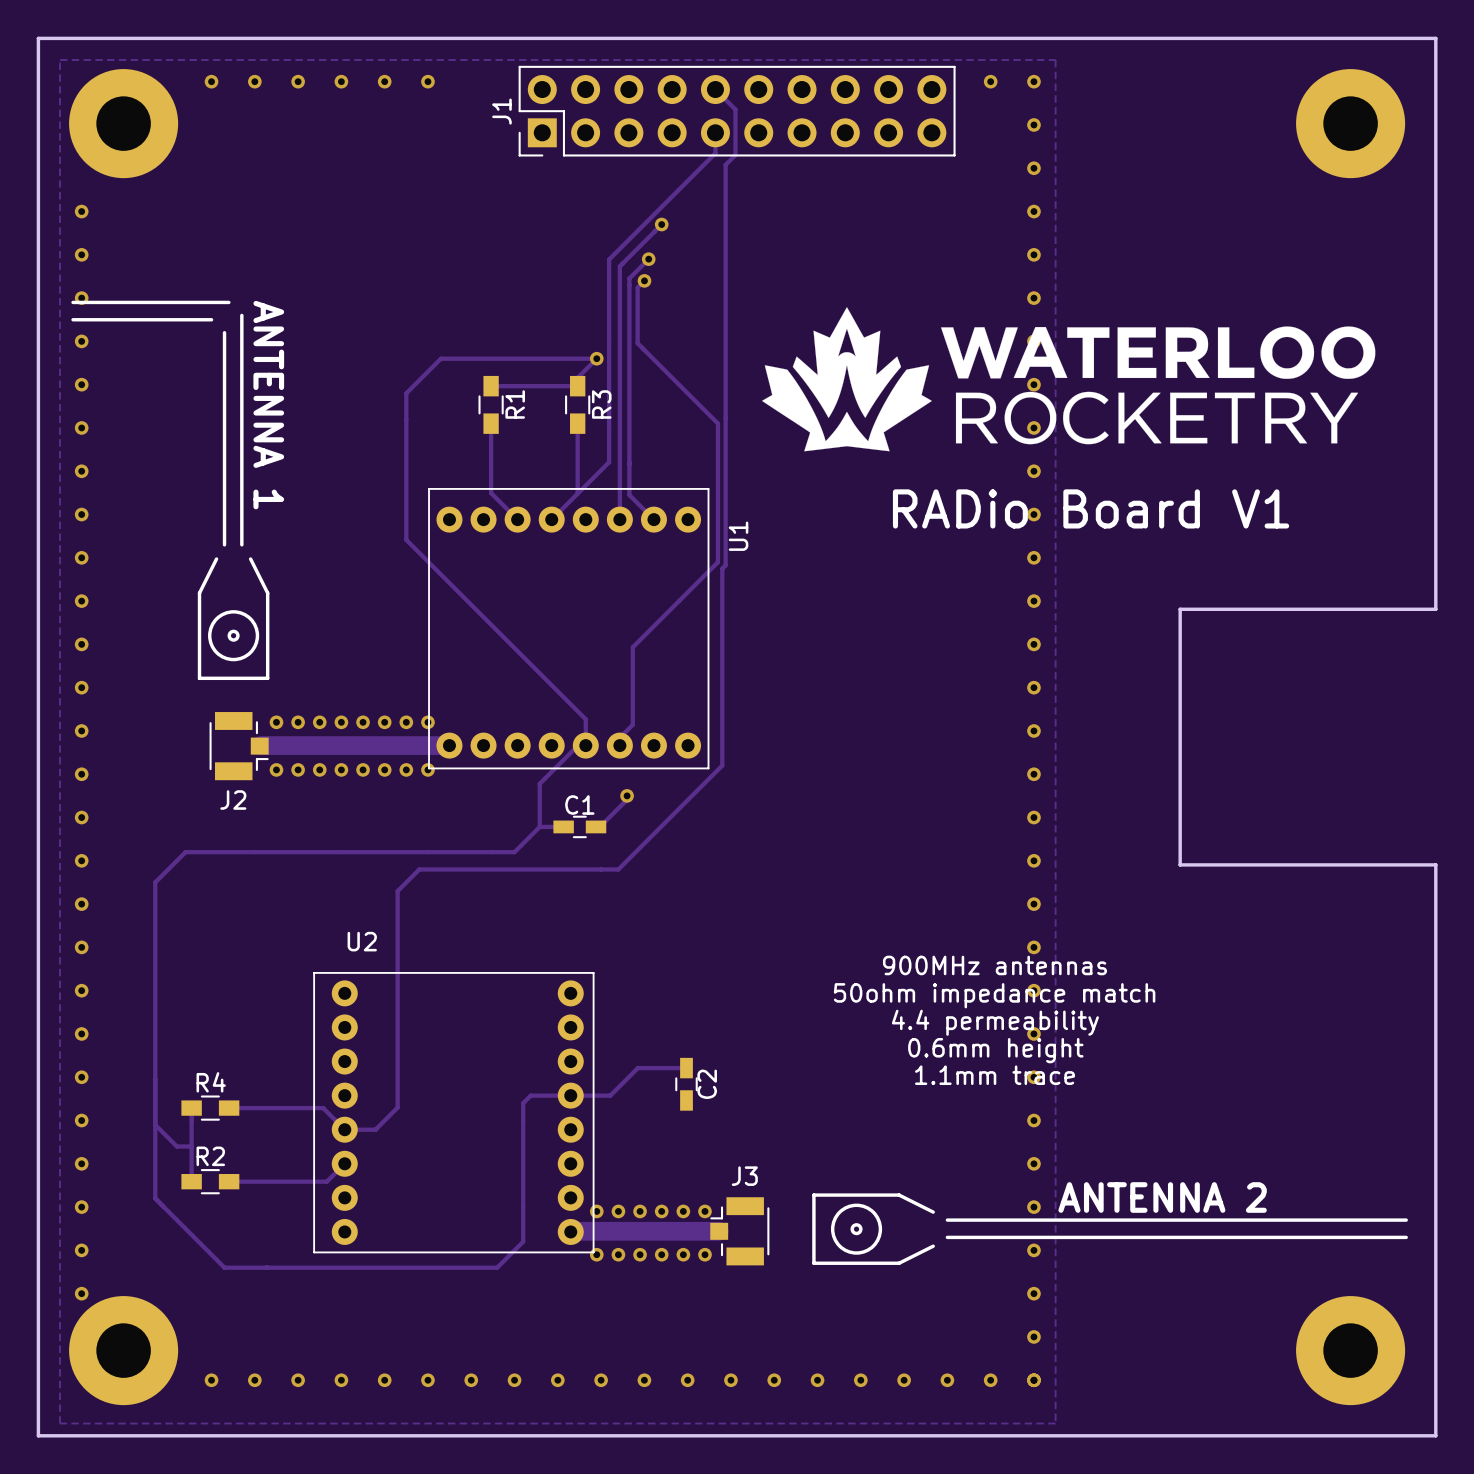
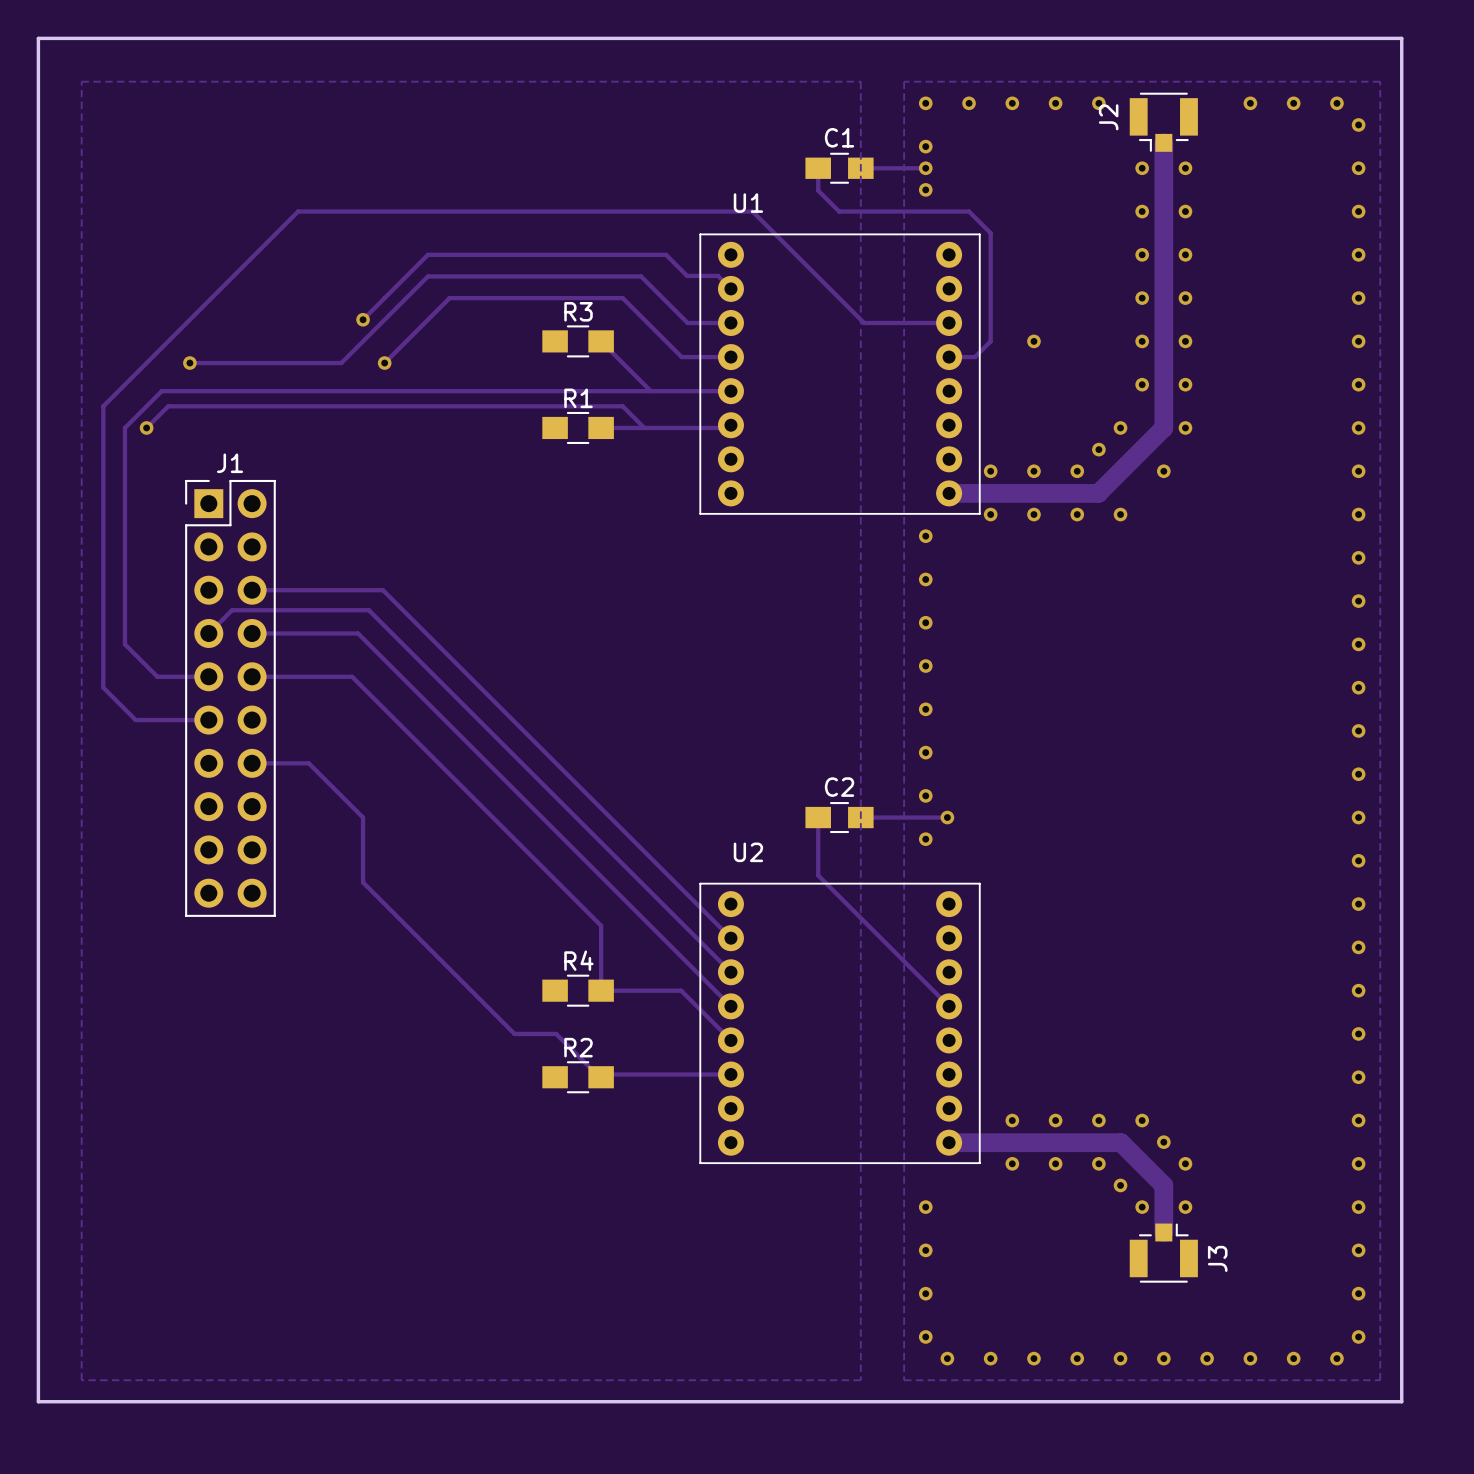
board edge: (1401, 38) (1435, 38) (1435, 609) (1180, 609) (1180, 864) (1435, 864) (1435, 1435) (38, 1435) (38, 1401) -> (1401, 38) (1401, 1401) (38, 1401)
zone outline: (60, 60) (1055, 60) (1055, 1423) (60, 1423) (60, 60) -> (81, 81) (81, 1380) (860, 1380) (860, 81) (81, 81)
via: (211, 81) -> none
via: (254, 81) -> none
via: (298, 81) -> none
via: (341, 81) -> none
via: (384, 81) -> none
via: (427, 81) -> none
zone outline: none -> (904, 81) (1380, 81) (1380, 1380) (904, 1380) (904, 81)
via: (990, 81) -> none
via: (1033, 81) -> none
track: (715, 89) (735, 109) (735, 155) (725, 164) (725, 565) (722, 568) (722, 765) (618, 869) (419, 869) (397, 891) (397, 1107) (376, 1129) (344, 1129) (323, 1108) (229, 1108) -> none
via: none -> (925, 103)
via: none -> (969, 103)
via: none -> (1012, 103)
via: none -> (1055, 103)
via: none -> (1098, 103)
via: none -> (1250, 103)
via: none -> (1293, 103)
via: none -> (1336, 103)
J1 rotation: 0° (737, 111) -> 90° clockwise (230, 698)
J1 position: (737, 111) -> (230, 698)
part: (123, 123) -> none
part: (1350, 123) -> none
via: (1033, 124) -> none
via: none -> (1358, 124)
track: (715, 132) (715, 153) (609, 259) (609, 462) (551, 519) -> none
track: none -> (1163, 142) (1163, 427) (1098, 493) (949, 493)
via: none -> (925, 146)
track: none -> (818, 168) (818, 190) (839, 211) (969, 211) (990, 233) (990, 341) (975, 357) (949, 357)
track: none -> (860, 168) (925, 168)
via: none -> (925, 168)
via: (1033, 168) -> none
via: none -> (1142, 168)
via: none -> (1185, 168)
via: none -> (1358, 168)
via: none -> (925, 189)
via: (81, 211) -> none
via: (1033, 211) -> none
via: none -> (1142, 211)
via: none -> (1185, 211)
via: none -> (1358, 211)
track: (661, 224) (619, 266) (619, 519) -> none
via: (661, 224) -> none
via: (81, 254) -> none
via: (1033, 254) -> none
via: none -> (1142, 254)
via: none -> (1185, 254)
via: none -> (1358, 254)
track: (648, 259) (629, 278) (629, 495) (653, 519) -> none
via: (648, 259) -> none
track: (644, 280) (637, 287) (637, 343) (717, 423) (717, 562) (632, 647) (632, 724) (619, 737) -> none
via: (644, 280) -> none
track: none -> (730, 288) (717, 275) (687, 275) (666, 254) (427, 254) (363, 319)
via: (81, 298) -> none
via: (1033, 298) -> none
via: none -> (1142, 298)
via: none -> (1185, 298)
via: none -> (1358, 298)
line: (73, 302) (228, 302) -> none
drawing: [762, 307, 1376, 452] -> none
line: (241, 315) (241, 544) -> none
line: (73, 319) (211, 319) -> none
via: none -> (363, 319)
track: none -> (730, 322) (687, 322) (641, 276) (427, 276) (341, 363) (189, 363)
track: none -> (949, 322) (864, 322) (752, 211) (298, 211) (103, 406) (103, 687) (135, 720) (208, 720)
line: (224, 332) (224, 544) -> none
via: (81, 341) -> none
track: none -> (601, 341) (650, 391)
via: none -> (1142, 341)
via: none -> (1185, 341)
via: none -> (1358, 341)
track: none -> (730, 357) (681, 357) (622, 298) (449, 298) (384, 363)
via: (596, 358) -> none
via: none -> (189, 363)
via: none -> (384, 363)
R1 footprint: [478, 375, 504, 434] -> [542, 411, 614, 444]
R3 footprint: [565, 375, 591, 434] -> [542, 325, 614, 358]
via: (81, 384) -> none
via: (1033, 384) -> none
via: none -> (1142, 384)
via: none -> (1185, 384)
via: none -> (1358, 384)
track: (491, 386) (577, 386) (577, 377) (596, 358) (440, 358) (406, 393) (406, 539) (585, 719) (585, 737) (539, 783) (539, 826) -> none
track: none -> (730, 391) (161, 391) (124, 427) (124, 644) (157, 676) (208, 676)
R1 name position: R1 (515, 404) -> R1 (578, 398)
R3 name position: R3 (601, 404) -> R3 (578, 311)
text: ANTENNA 1 (268, 405) -> none
track: (491, 423) (491, 493) (517, 519) -> none
track: (577, 423) (577, 493) -> none
track: none -> (730, 425) (728, 427) (601, 427)
via: (81, 427) -> none
track: none -> (146, 427) (168, 406) (622, 406) (644, 427)
via: none -> (146, 427)
via: (1033, 427) -> none
via: none -> (1120, 427)
via: none -> (1185, 427)
via: none -> (1358, 427)
via: none -> (1098, 449)
via: (81, 471) -> none
via: none -> (990, 471)
via: none -> (1077, 471)
via: none -> (1163, 471)
via: none -> (1358, 471)
U1 footprint: [428, 488, 710, 770] -> [699, 233, 981, 515]
text: RADio Board V1 (1091, 508) -> none
via: (81, 514) -> none
via: none -> (990, 514)
via: none -> (1077, 514)
via: none -> (1120, 514)
via: none -> (1358, 514)
U1 name position: U1 (738, 536) -> U1 (748, 203)
via: none -> (925, 536)
via: (81, 557) -> none
via: (1033, 557) -> none
via: none -> (1358, 557)
line: (216, 559) (199, 593) (199, 678) (267, 678) (267, 593) (250, 559) -> none
via: none -> (925, 579)
track: none -> (252, 590) (382, 590) (730, 938)
via: (81, 601) -> none
via: (1033, 601) -> none
via: none -> (1358, 601)
drawing: [208, 610, 260, 662] -> none
via: none -> (925, 622)
track: none -> (208, 633) (232, 610) (368, 610) (730, 972)
track: none -> (252, 633) (358, 633) (730, 1006)
via: (81, 644) -> none
via: (1033, 644) -> none
via: none -> (1358, 644)
via: none -> (925, 666)
track: none -> (252, 676) (352, 676) (601, 925) (601, 990) (681, 990) (730, 1040)
via: (81, 687) -> none
via: (1033, 687) -> none
via: none -> (1358, 687)
via: none -> (925, 709)
via: (276, 722) -> none
via: (298, 722) -> none
via: (319, 722) -> none
via: (341, 722) -> none
via: (363, 722) -> none
via: (384, 722) -> none
via: (406, 722) -> none
via: (427, 722) -> none
via: (81, 730) -> none
via: (1033, 730) -> none
via: none -> (1358, 730)
track: (449, 745) (259, 746) -> none
J2 rotation: 0° (239, 746) -> 90° clockwise (1163, 122)
J2 position: (239, 746) -> (1163, 122)
via: none -> (925, 752)
track: none -> (252, 763) (308, 763) (363, 817) (363, 882) (514, 1033) (556, 1033) (599, 1077) (603, 1074) (730, 1074)
via: (276, 769) -> none
via: (298, 769) -> none
via: (319, 769) -> none
via: (341, 769) -> none
via: (363, 769) -> none
via: (384, 769) -> none
via: (406, 769) -> none
via: (427, 769) -> none
via: (81, 774) -> none
via: (1033, 774) -> none
via: none -> (1358, 774)
track: (627, 795) (627, 799) (599, 826) (596, 826) -> none
via: (627, 795) -> none
via: none -> (925, 795)
C1 footprint: [553, 815, 607, 839] -> [805, 152, 874, 184]
via: (81, 817) -> none
track: none -> (818, 817) (818, 875) (949, 1006)
track: none -> (860, 817) (947, 817)
via: none -> (947, 817)
via: (1033, 817) -> none
via: none -> (1358, 817)
track: (539, 826) (563, 826) -> none
track: (539, 826) (514, 852) (185, 852) (155, 882) (155, 1198) (224, 1267) (497, 1267) (523, 1241) (523, 1103) (530, 1095) (562, 1095) -> none
via: none -> (925, 839)
via: (81, 860) -> none
via: (1033, 860) -> none
via: none -> (1358, 860)
via: (81, 904) -> none
via: (1033, 904) -> none
via: none -> (1358, 904)
via: (81, 947) -> none
via: (1033, 947) -> none
via: none -> (1358, 947)
text: 900MHz antennas (995, 965) -> none
U2 footprint: [313, 972, 595, 1254] -> [699, 882, 981, 1164]
via: (81, 990) -> none
via: (1033, 990) -> none
via: none -> (1358, 990)
text: 50ohm impedance match (994, 995) -> none
text: 4.4 permeability (995, 1022) -> none
via: (81, 1033) -> none
via: (1033, 1033) -> none
via: none -> (1358, 1033)
text: 0.6mm height (995, 1050) -> none
C2 footprint: [675, 1057, 698, 1111] -> [805, 802, 874, 834]
track: (686, 1068) (637, 1068) (610, 1095) (570, 1095) -> none
text: 1.1mm trace (995, 1075) -> none
via: (81, 1077) -> none
via: (1033, 1077) -> none
via: none -> (1358, 1077)
C2 name position: C2 (707, 1084) -> C2 (839, 787)
R4 footprint: [181, 1095, 240, 1121] -> [542, 974, 614, 1007]
track: (191, 1108) (191, 1181) -> none
via: (81, 1120) -> none
via: none -> (1012, 1120)
via: (1033, 1120) -> none
via: none -> (1055, 1120)
via: none -> (1098, 1120)
via: none -> (1142, 1120)
via: none -> (1358, 1120)
track: (155, 1124) (176, 1146) (191, 1146) -> none
track: none -> (949, 1142) (1121, 1142) (1163, 1185) (1163, 1232)
via: none -> (1163, 1142)
via: (81, 1163) -> none
track: (344, 1163) (326, 1181) (229, 1181) -> none
via: none -> (1012, 1163)
via: (1033, 1163) -> none
via: none -> (1055, 1163)
via: none -> (1098, 1163)
via: none -> (1185, 1163)
via: none -> (1358, 1163)
R2 footprint: [181, 1169, 240, 1195] -> [542, 1061, 614, 1094]
via: none -> (1120, 1185)
text: ANTENNA 2 (1162, 1197) -> none
drawing: [830, 1203, 883, 1255] -> none
via: (81, 1207) -> none
via: none -> (925, 1207)
via: (1033, 1207) -> none
via: none -> (1142, 1207)
via: none -> (1185, 1207)
via: none -> (1358, 1207)
via: (596, 1211) -> none
via: (618, 1211) -> none
via: (640, 1211) -> none
via: (661, 1211) -> none
via: (683, 1211) -> none
via: (704, 1211) -> none
line: (933, 1212) (899, 1195) (813, 1195) (813, 1263) (899, 1263) (933, 1246) -> none
line: (947, 1220) (1406, 1220) -> none
track: (570, 1231) (718, 1231) -> none
J3 rotation: 0° (739, 1231) -> 90° clockwise (1163, 1253)
J3 position: (739, 1231) -> (1163, 1253)
line: (947, 1237) (1406, 1237) -> none
via: (81, 1250) -> none
via: none -> (925, 1250)
via: (1033, 1250) -> none
via: none -> (1358, 1250)
via: (596, 1254) -> none
via: (618, 1254) -> none
via: (640, 1254) -> none
via: (661, 1254) -> none
via: (683, 1254) -> none
via: (704, 1254) -> none
via: (81, 1293) -> none
via: none -> (925, 1293)
via: (1033, 1293) -> none
via: none -> (1358, 1293)
via: none -> (925, 1336)
via: (1033, 1336) -> none
via: none -> (1358, 1336)
part: (123, 1350) -> none
part: (1350, 1350) -> none
via: none -> (1033, 1358)
via: none -> (1077, 1358)
via: none -> (1120, 1358)
via: none -> (1163, 1358)
via: none -> (1207, 1358)
via: none -> (1250, 1358)
via: none -> (1293, 1358)
via: none -> (1336, 1358)
via: (211, 1380) -> none
via: (254, 1380) -> none
via: (298, 1380) -> none
via: (341, 1380) -> none
via: (384, 1380) -> none
via: (427, 1380) -> none
via: (471, 1380) -> none
via: (514, 1380) -> none
via: (557, 1380) -> none
via: (601, 1380) -> none
via: (644, 1380) -> none
via: (687, 1380) -> none
via: (730, 1380) -> none
via: (774, 1380) -> none
via: (817, 1380) -> none
via: (860, 1380) -> none
via: (904, 1380) -> none
via position: (947, 1380) -> (947, 1358)
via position: (990, 1380) -> (990, 1358)
via: (1033, 1380) -> none

